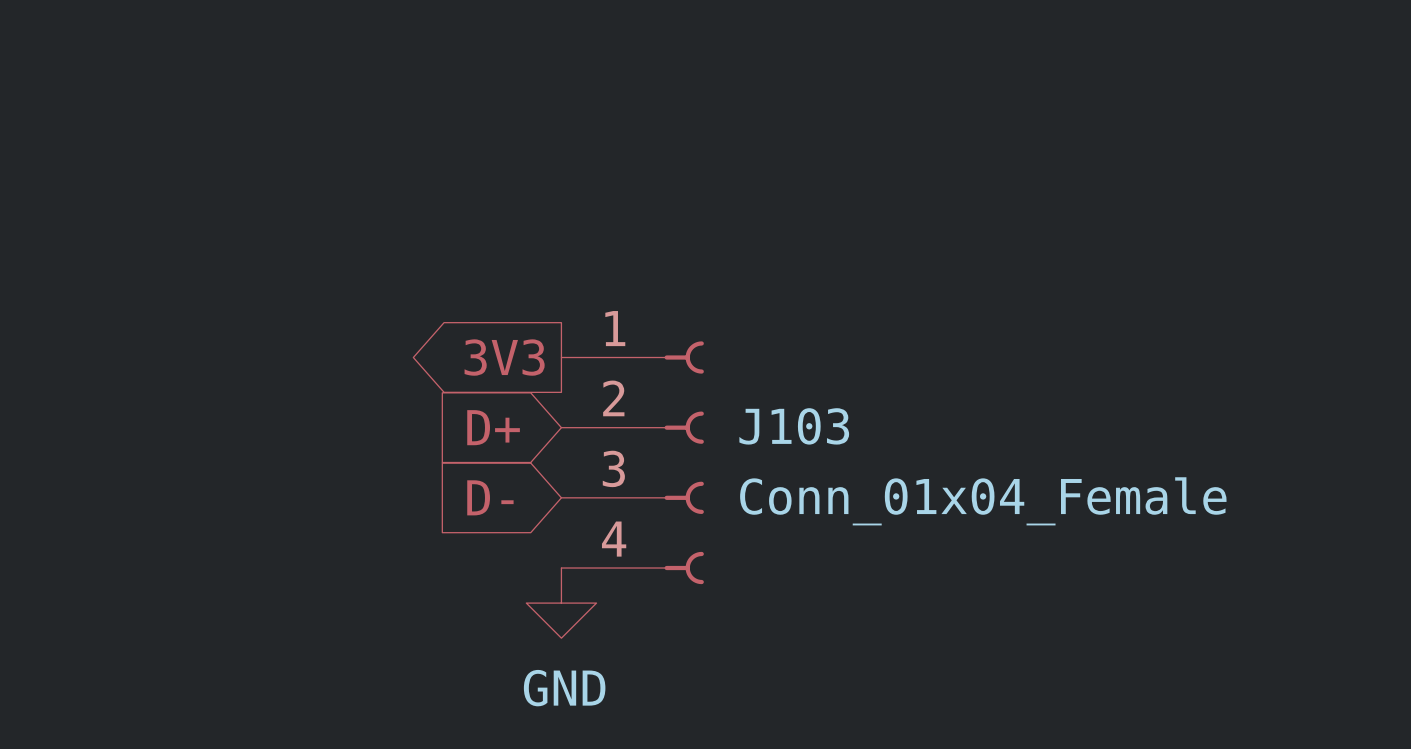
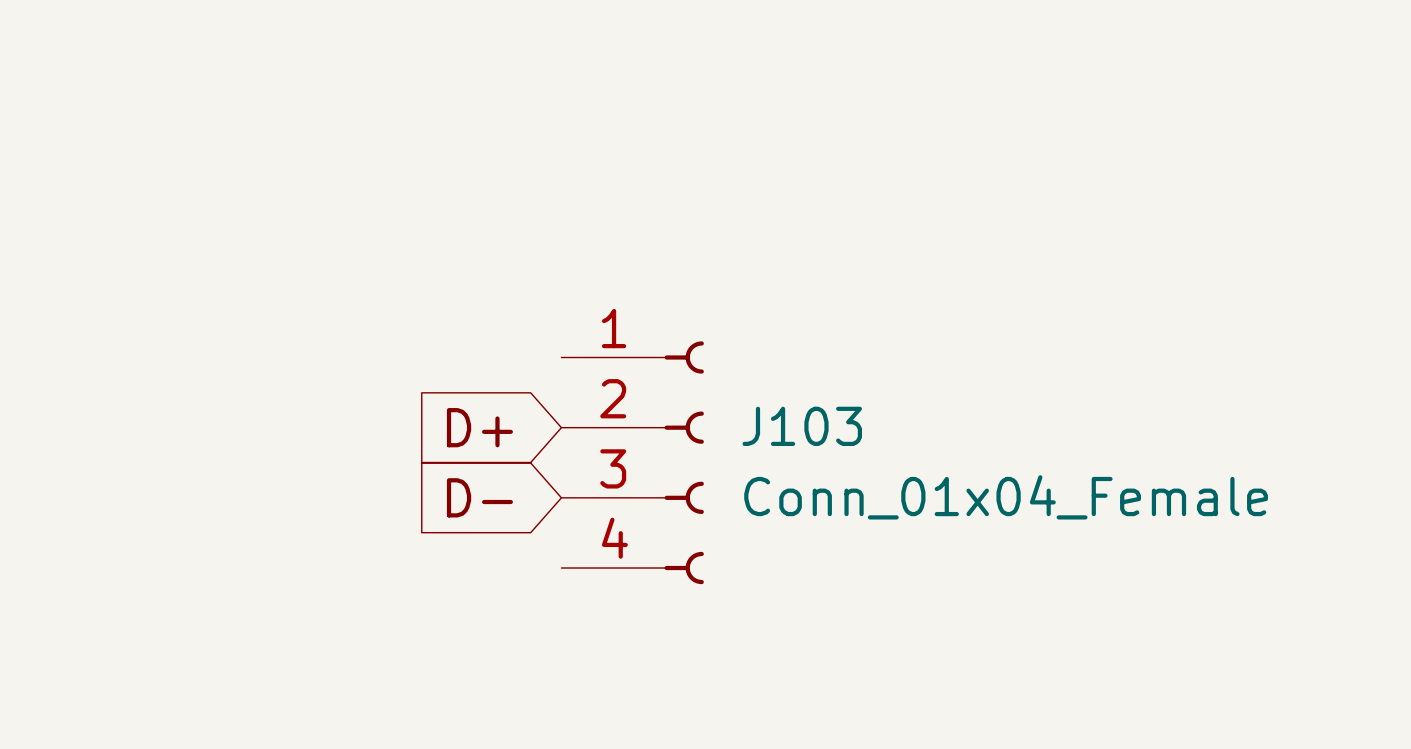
global label: 3V3 (504, 357) -> none
power symbol: GND (561, 603) -> none

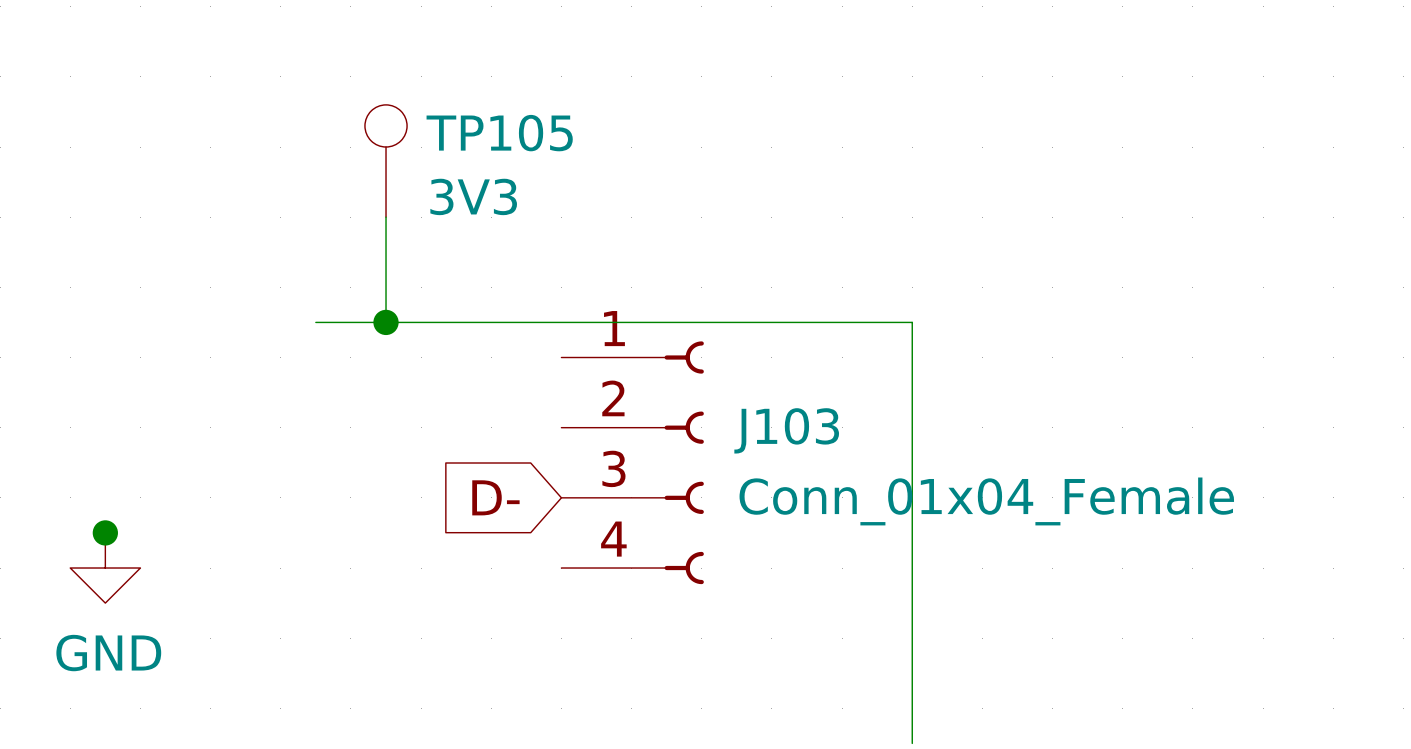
TP105: none -> 3V3 (386, 161)
wire: none -> (386, 217) (386, 322)
wire: none -> (315, 322) (912, 322) (912, 743)
junction: none -> (386, 322)
global label: D+ (479, 427) -> none
junction: none -> (105, 532)
power symbol: none -> GND (105, 568)

